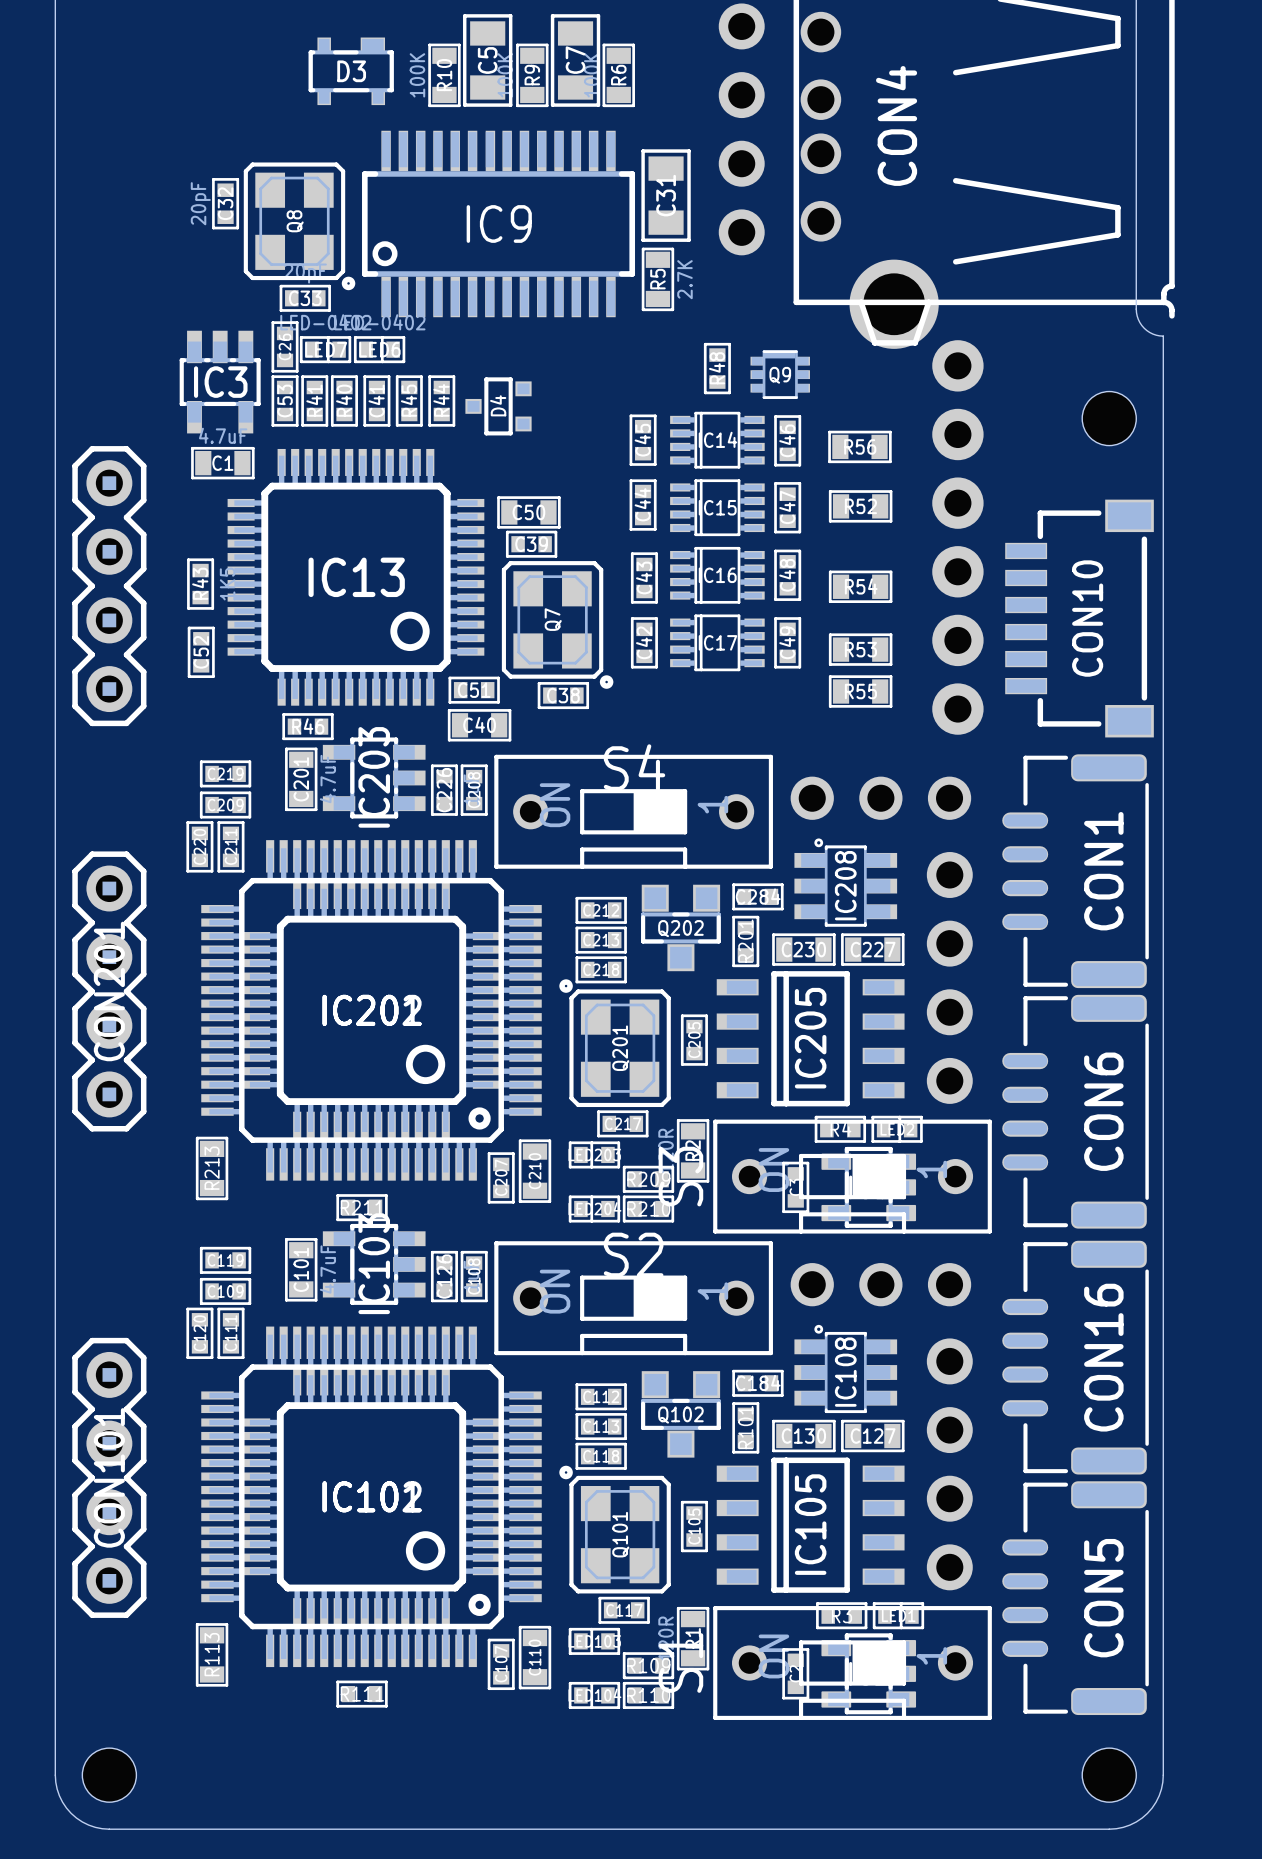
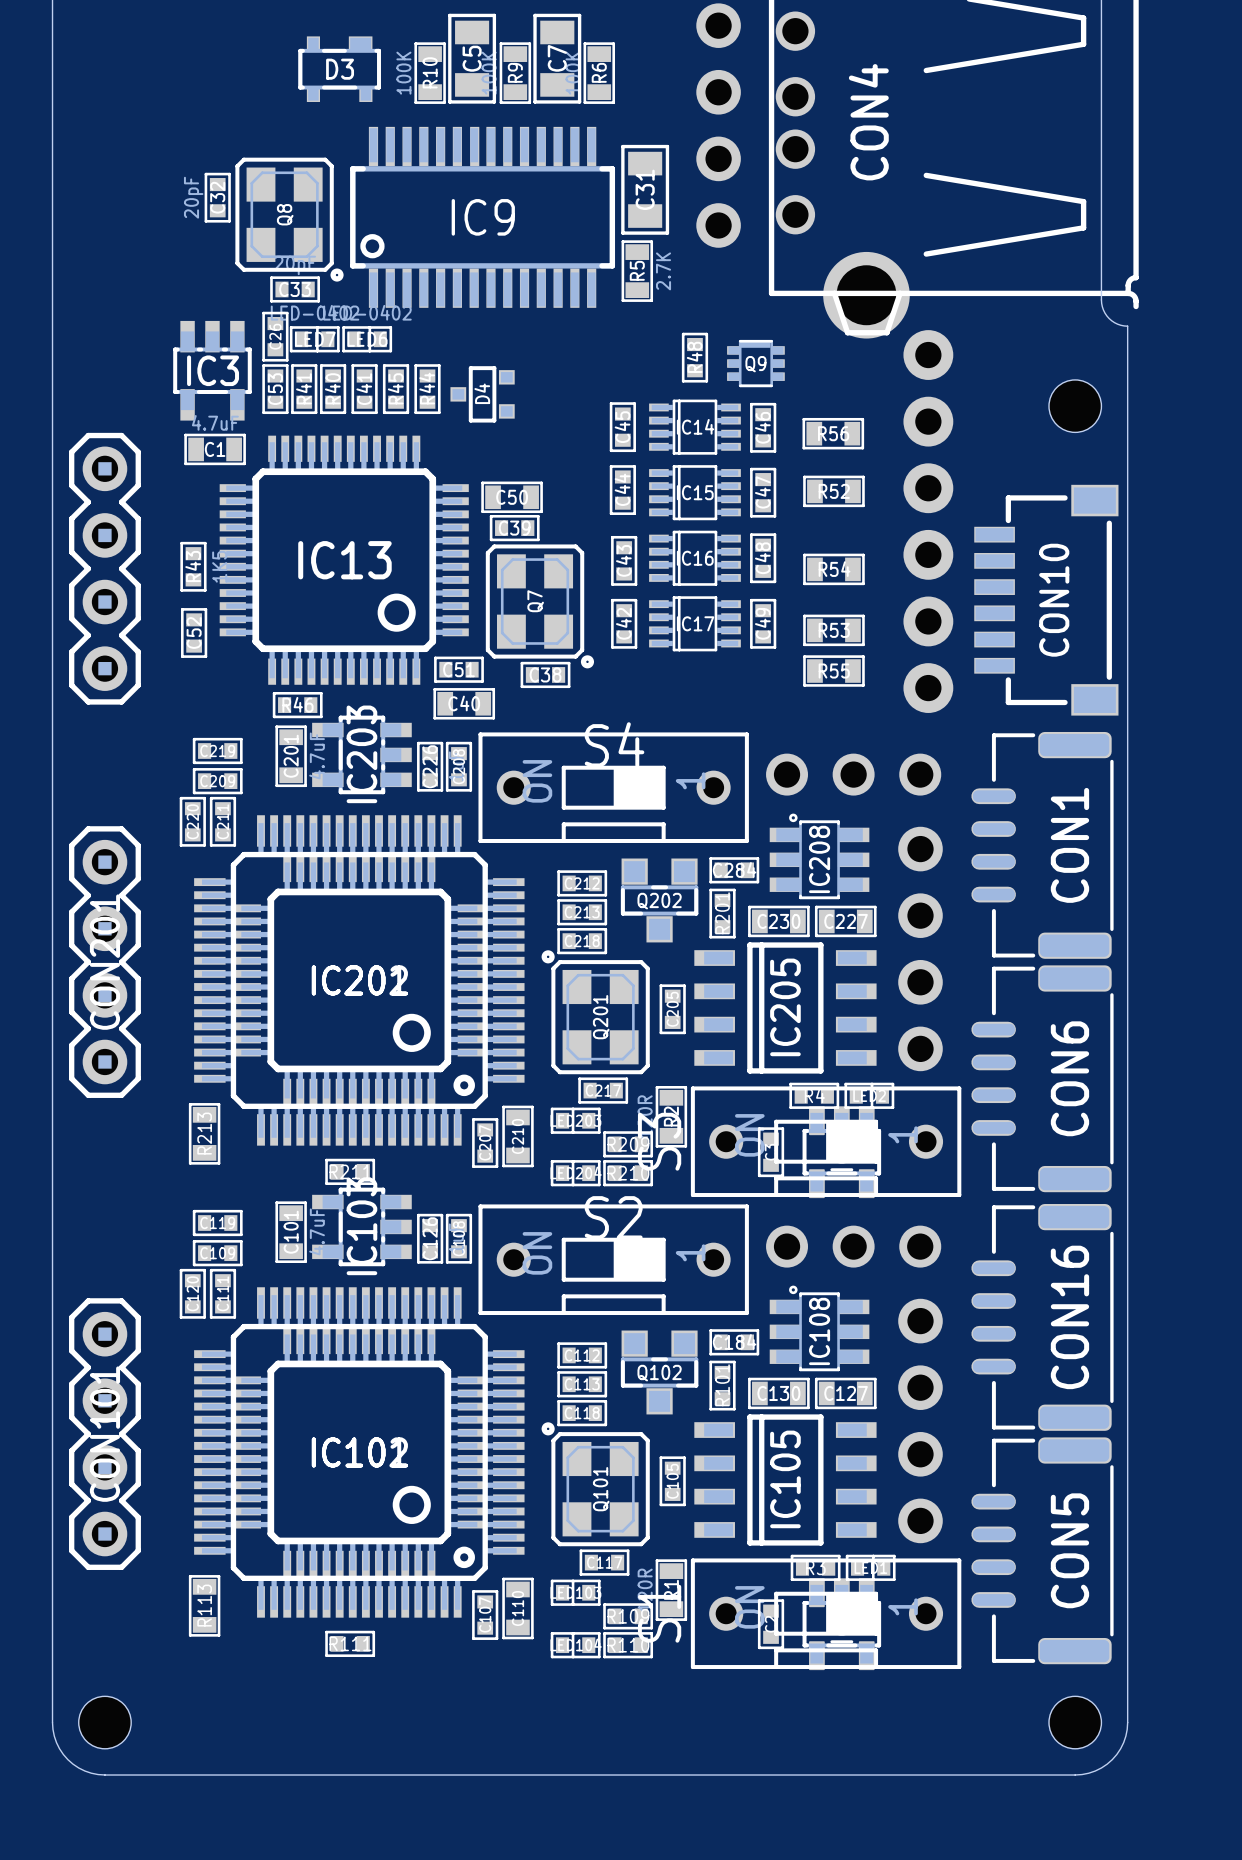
part rotation: 0° (868, 1187) -> 90° counterclockwise (841, 1152)
part rotation: 0° (868, 1673) -> 90° counterclockwise (841, 1624)

